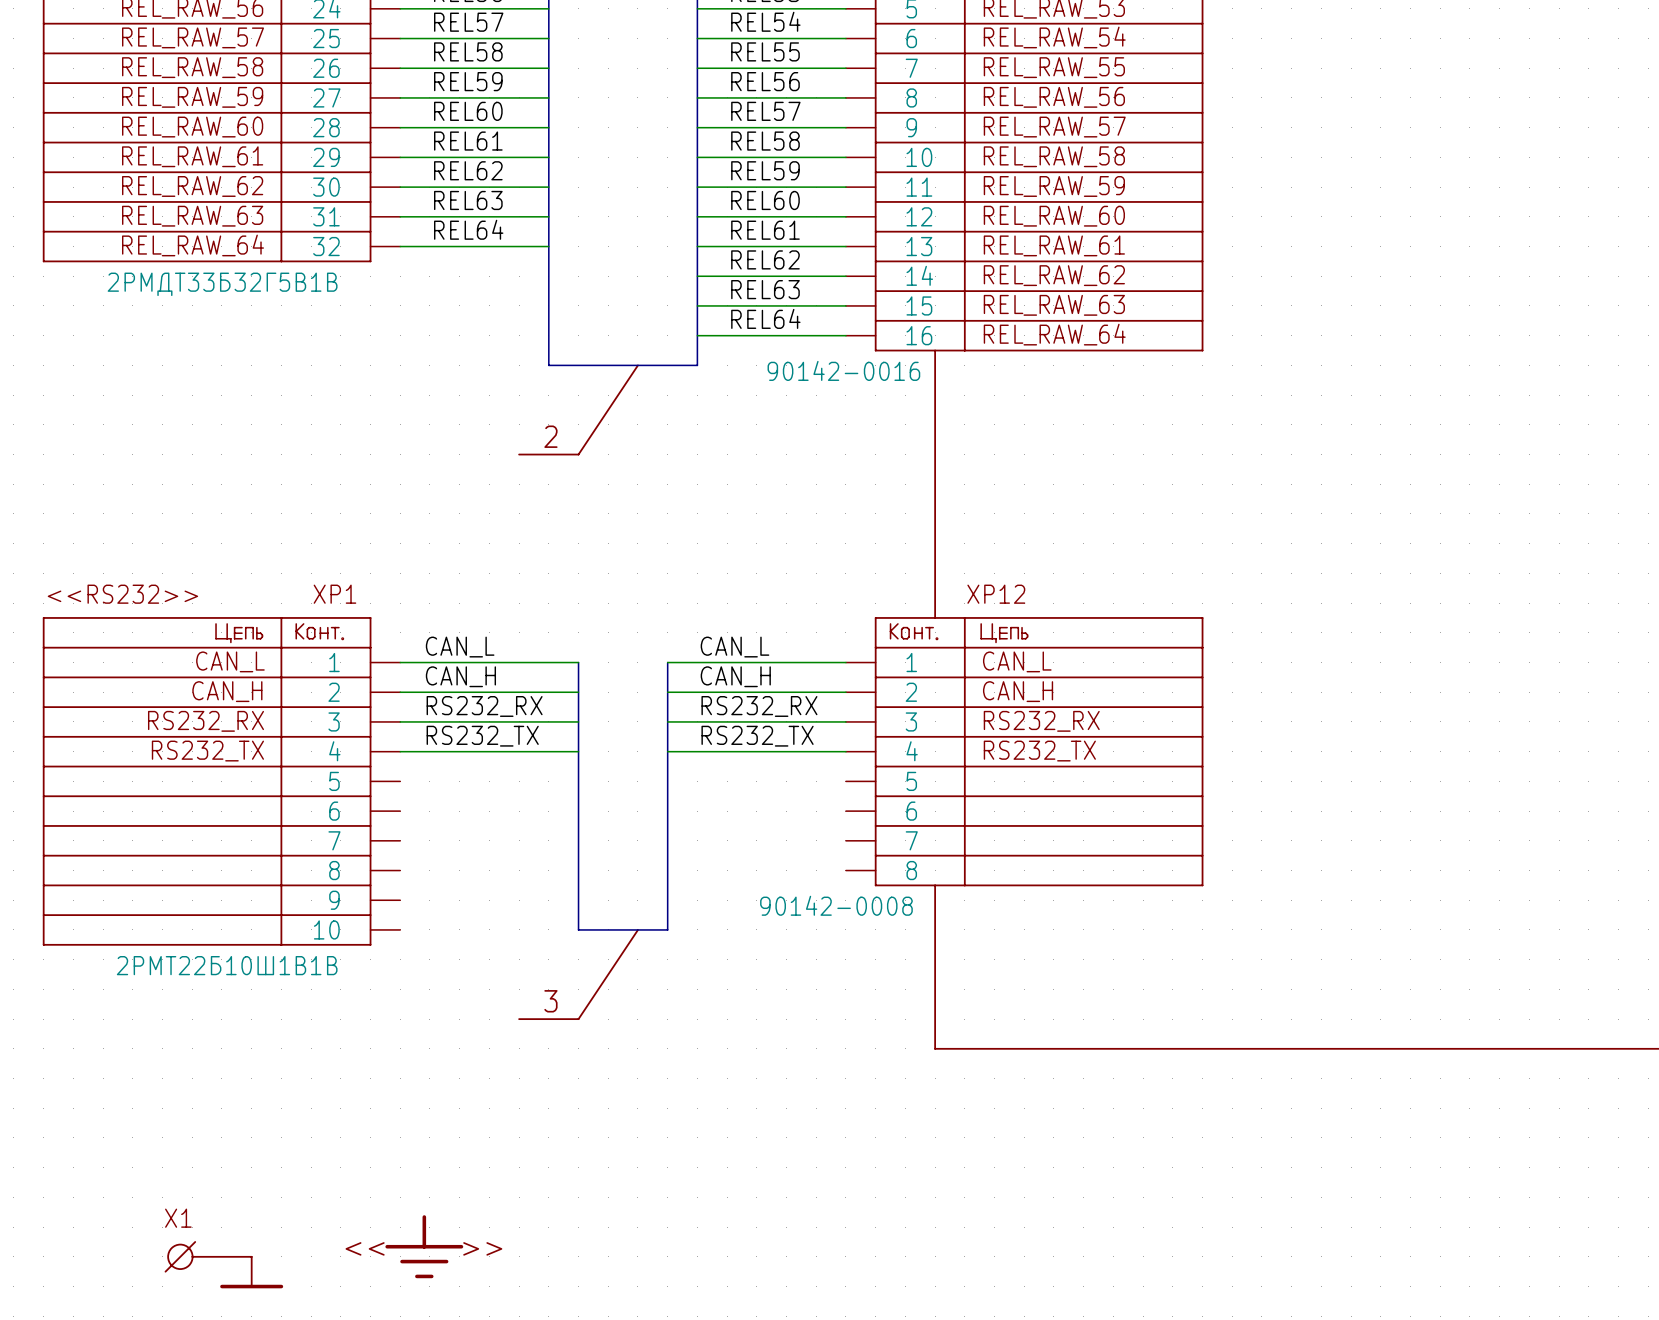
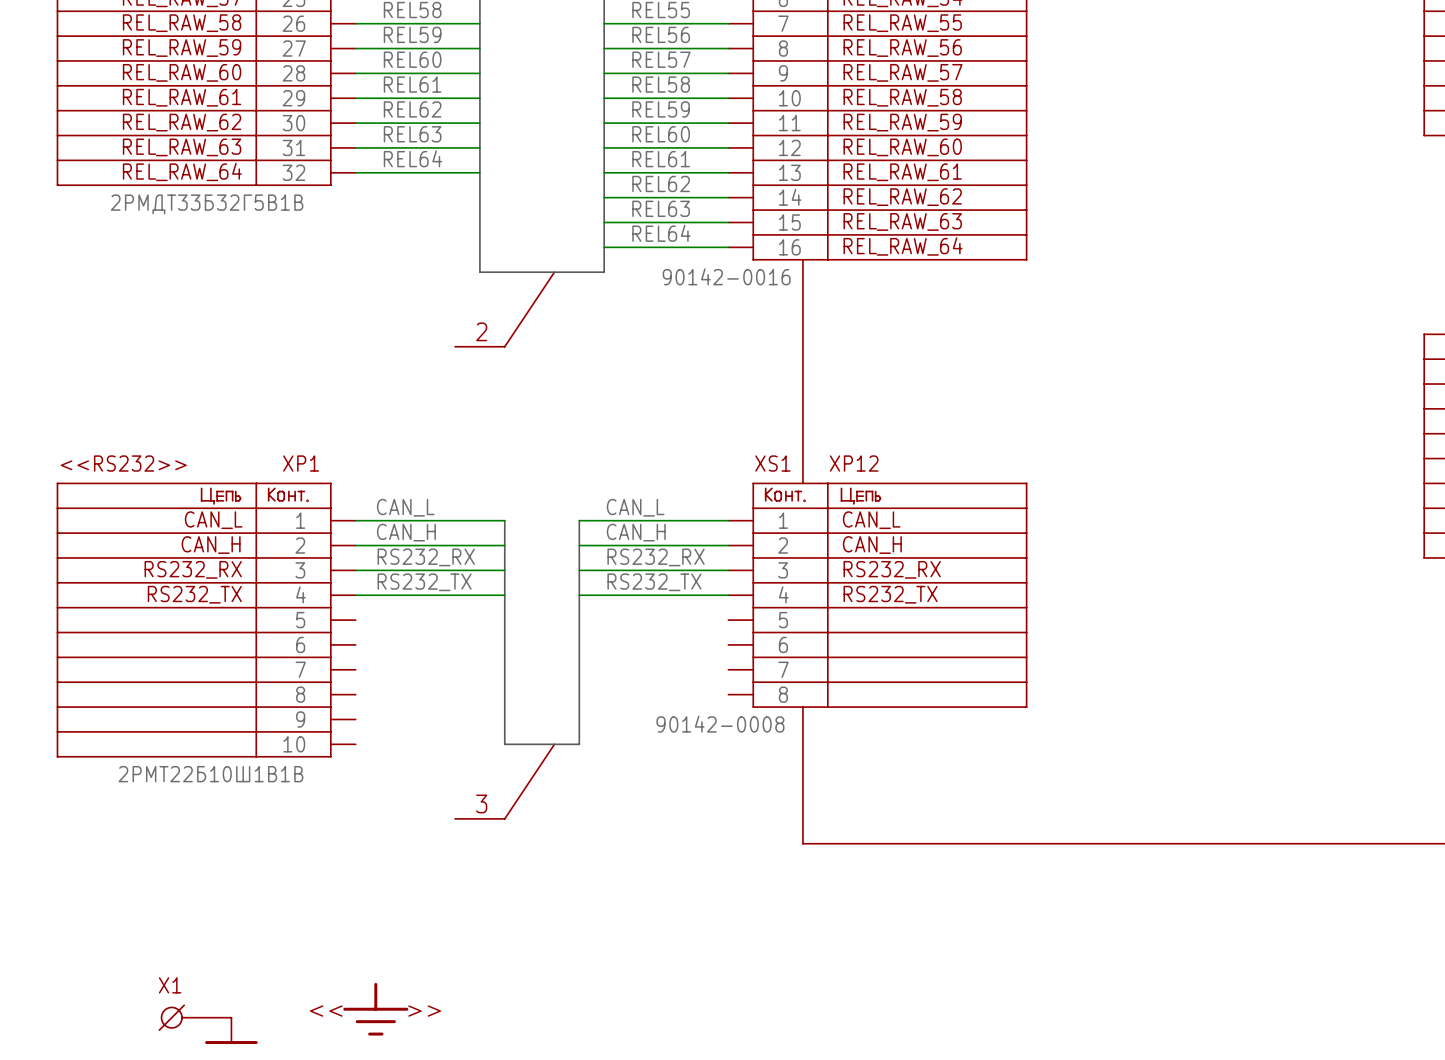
text: none -> XS1 (772, 463)

